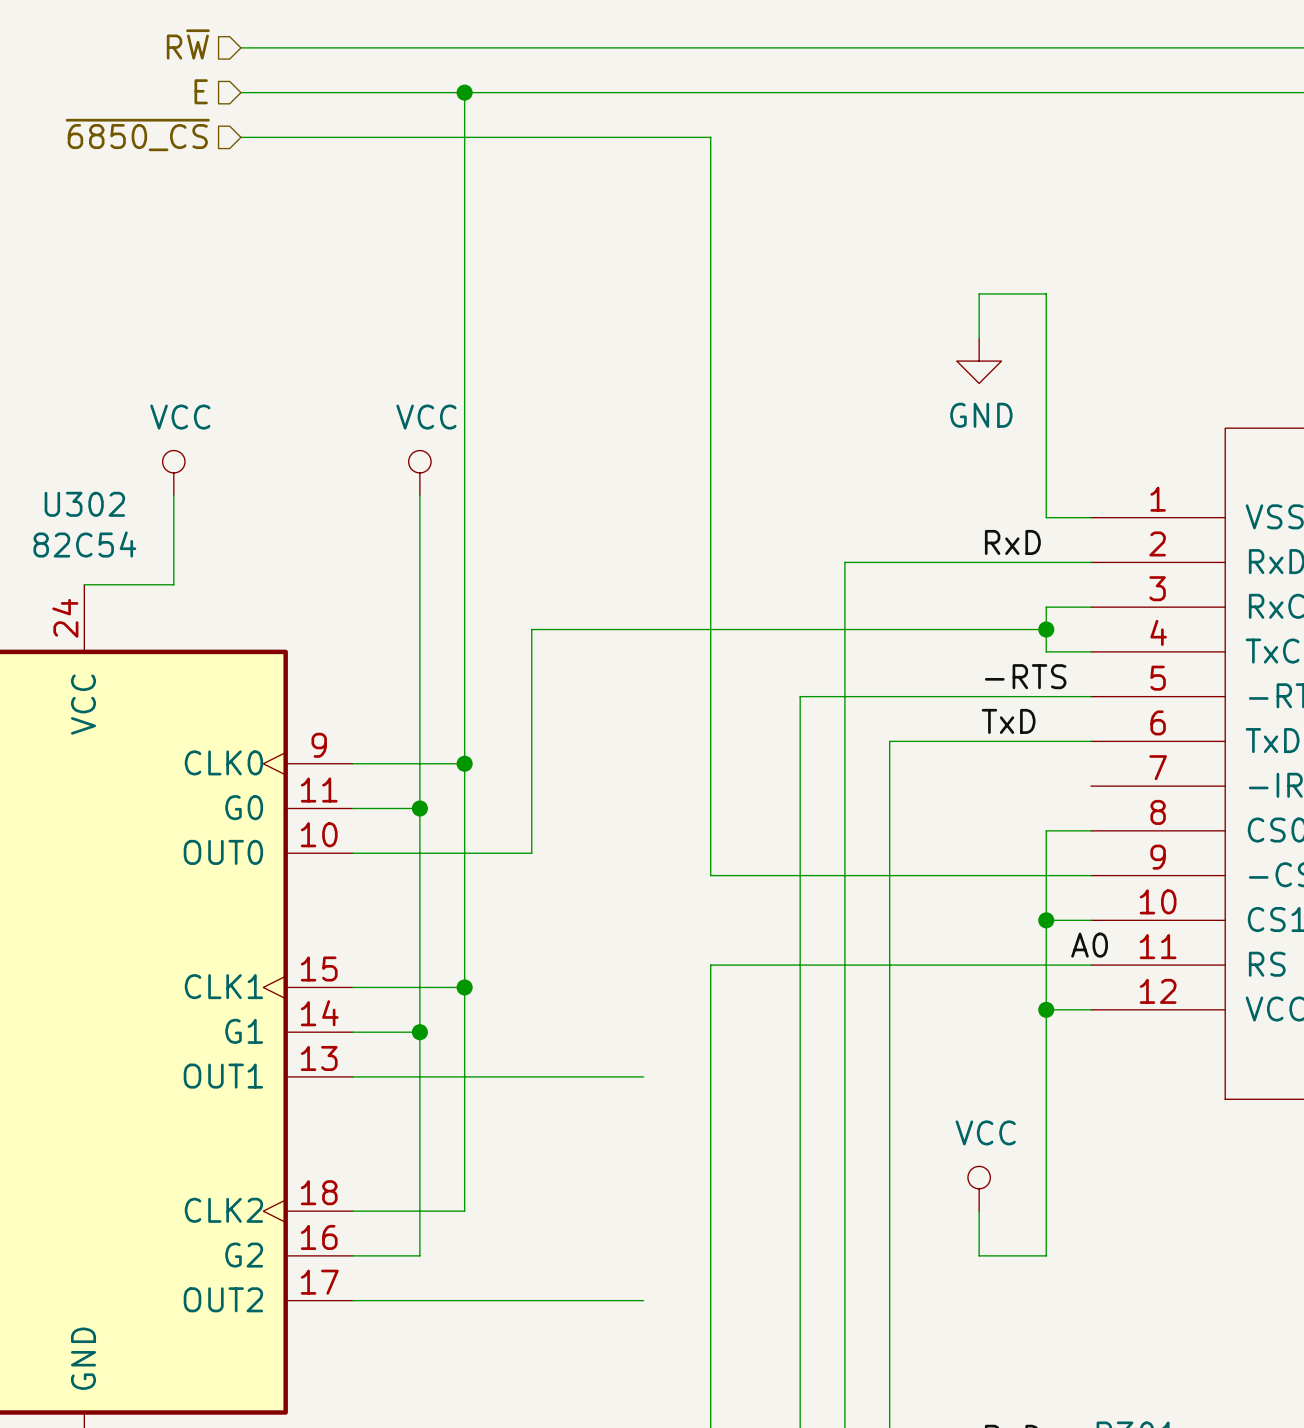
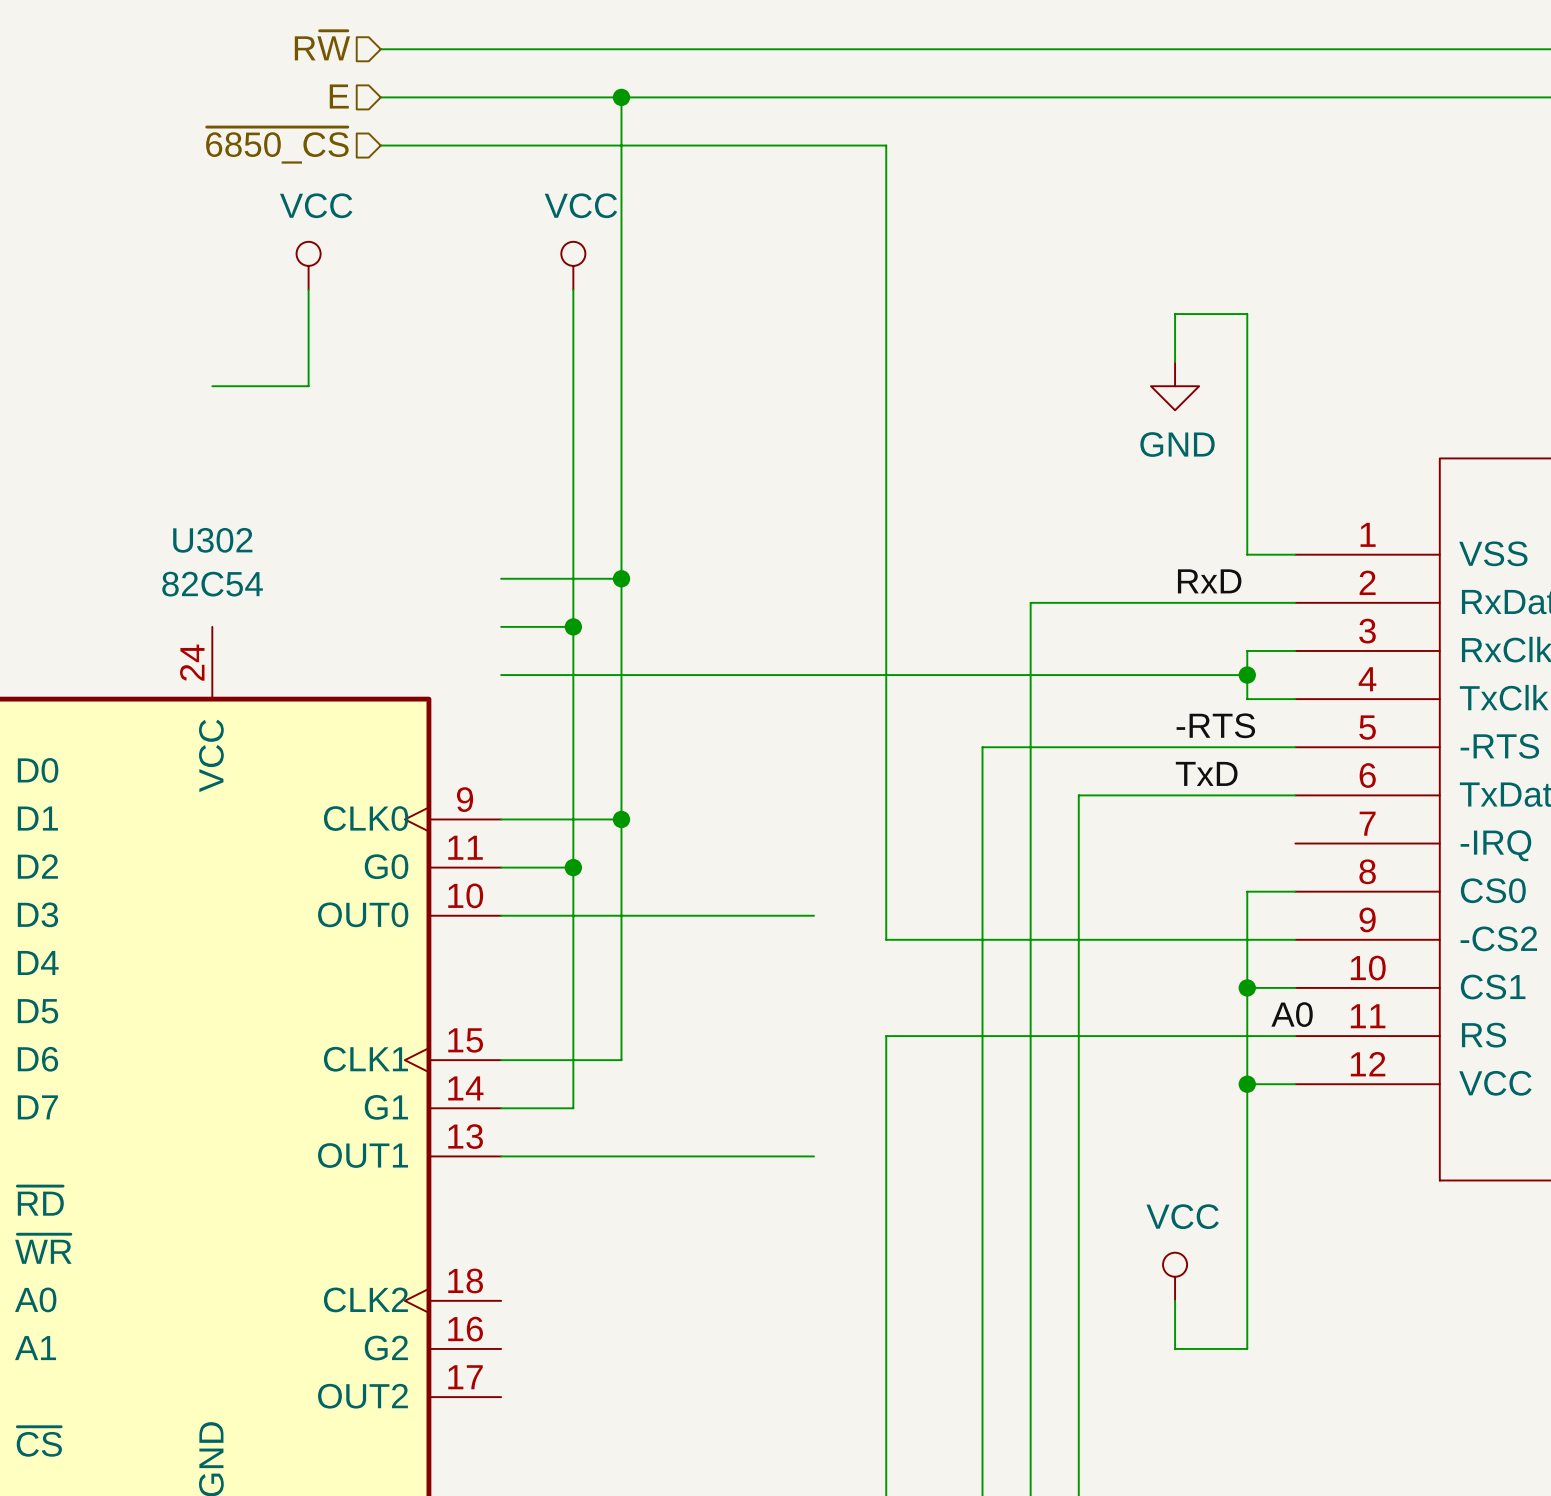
power symbol: none -> VCC (308, 265)
power symbol: none -> VCC (573, 265)
wire: none -> (573, 289) (573, 530)
power symbol: VCC (173, 472) -> none
power symbol: VCC (419, 472) -> none
wire: (173, 495) (173, 584) (84, 584) -> (308, 289) (308, 386) (212, 386)
wire: none -> (501, 578) (621, 578)
junction: none -> (621, 578)
wire: none -> (501, 626) (573, 626)
junction: none -> (573, 626)
wire: none -> (501, 675) (693, 675)
wire: (531, 629) (531, 853) -> (814, 915) (693, 915)
wire: (464, 987) (464, 1211) (352, 1211) -> none
junction: (464, 987) -> none
wire: (419, 1032) (419, 1255) (352, 1255) -> none
junction: (419, 1032) -> none
wire: (352, 1300) (643, 1300) -> none

